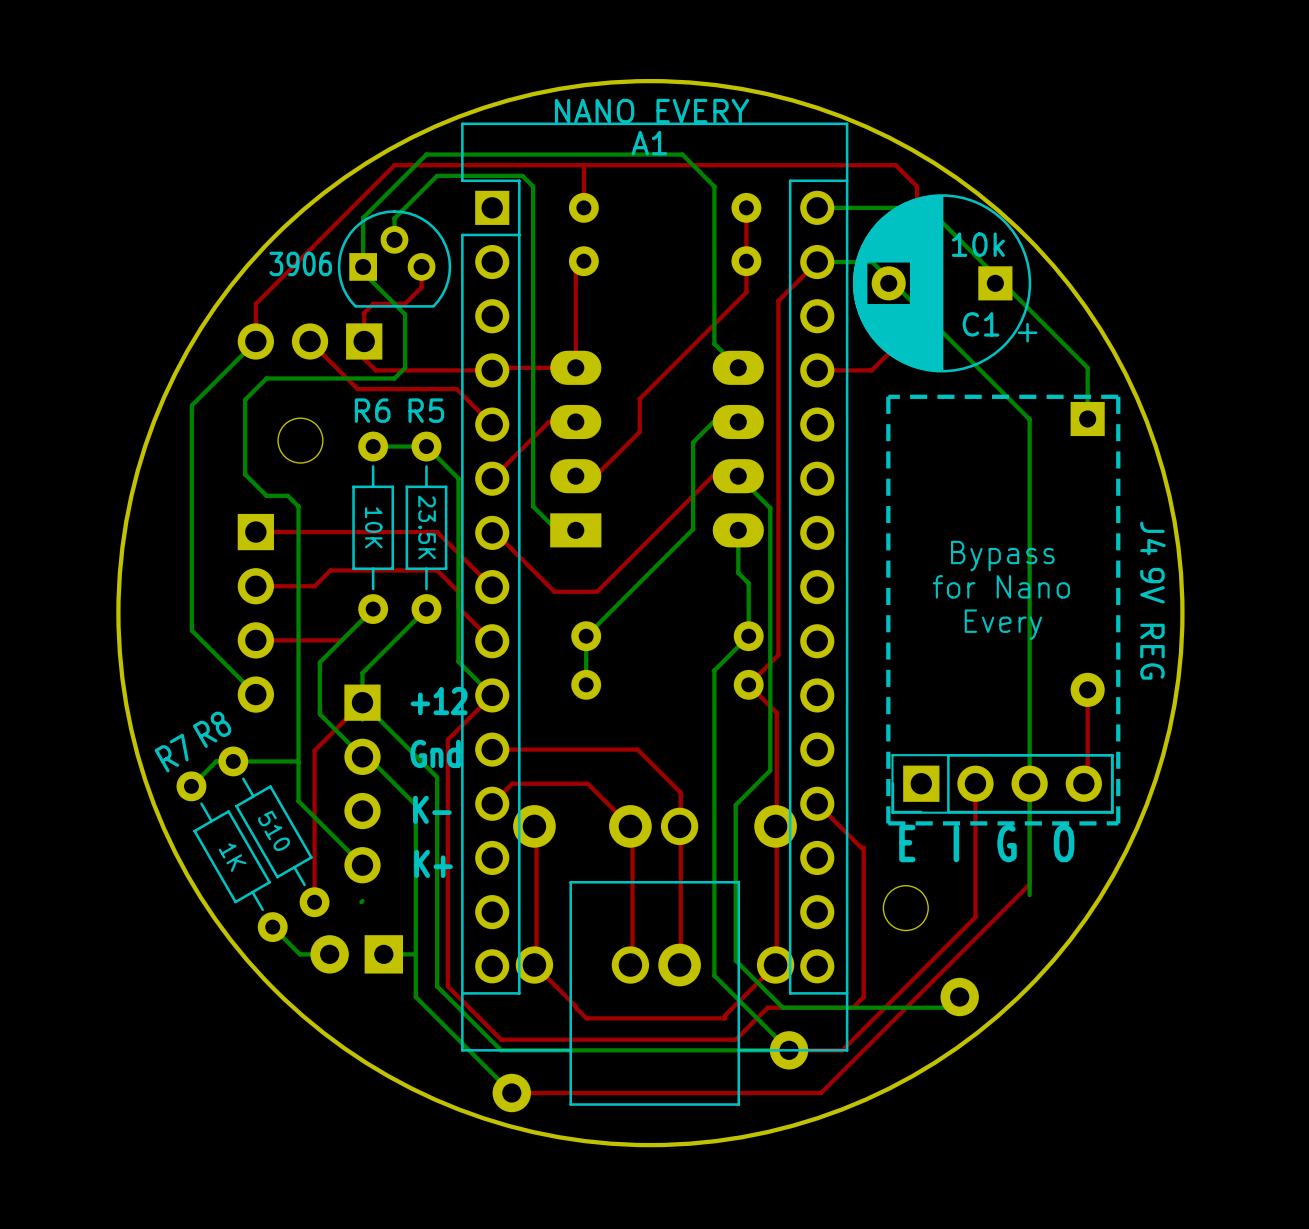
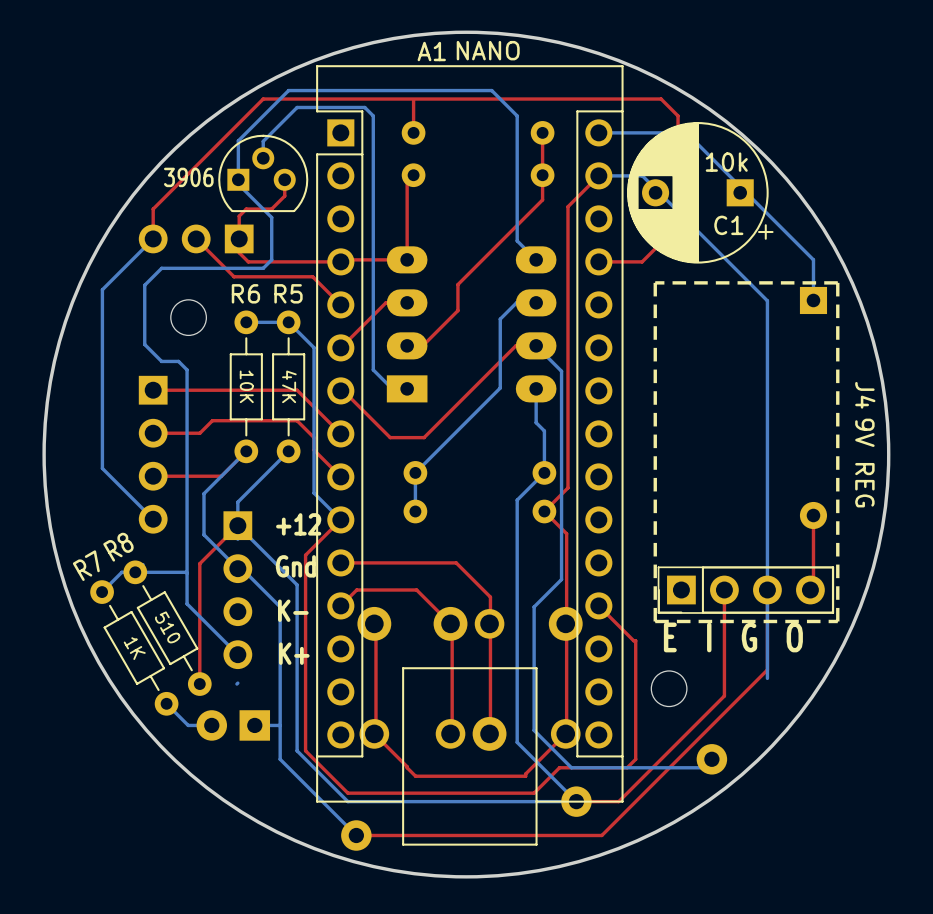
A1 value: NANO EVERY (651, 111) -> NANO (488, 50)
A1 name position: A1 (649, 143) -> A1 (431, 51)
R5 text: 23.5K (427, 527) -> 47K (289, 386)
text: Bypass (1002, 556) -> none
text: for Nano (1001, 586) -> none
text: Every (1003, 624) -> none

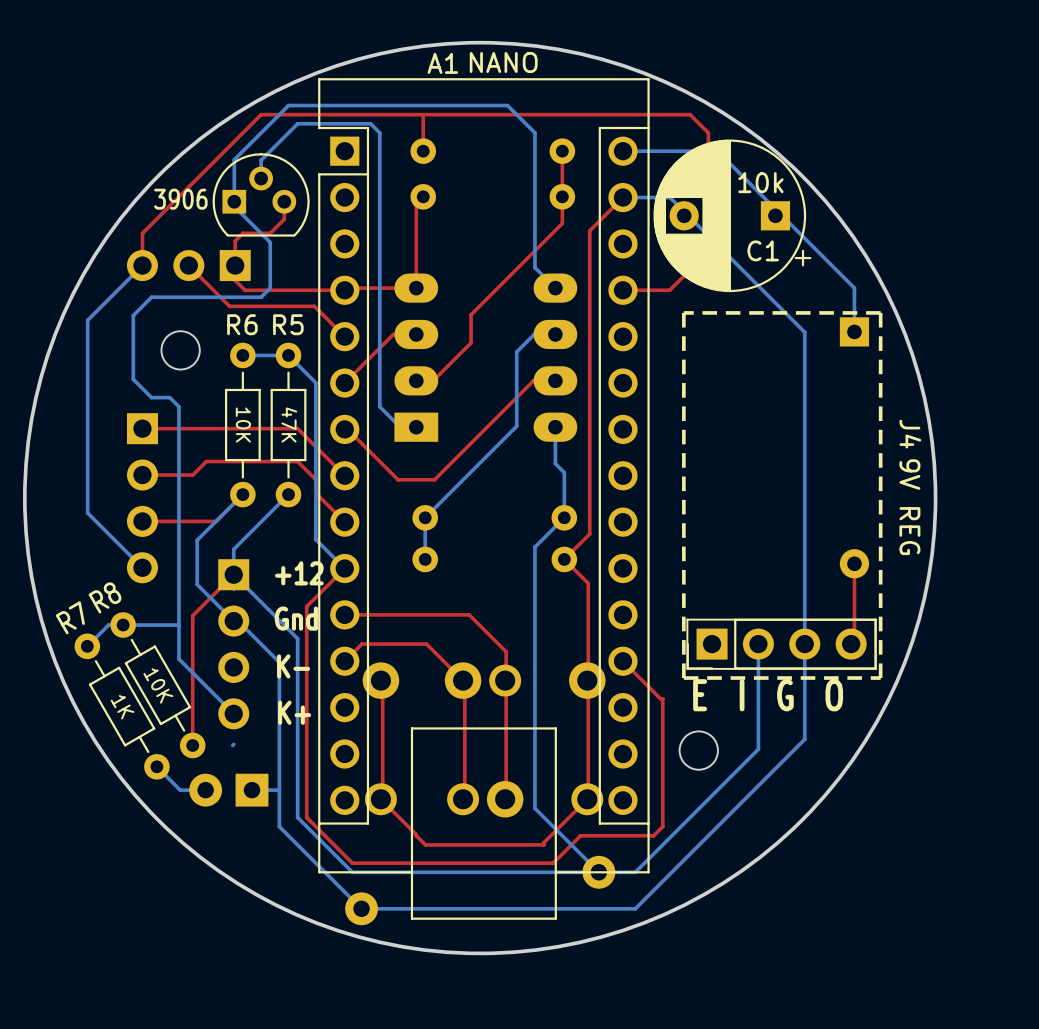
bottom track: (536, 345) (561, 371) (561, 579) (534, 606) (534, 730) (571, 767) (703, 767) (711, 759) -> none
top track: (724, 590) (724, 695) (618, 801) (576, 801) -> none
bottom track: none -> (758, 644) (758, 749) (635, 872) (598, 872)
top track: (767, 590) (767, 669) (601, 835) (356, 835) -> none
R8 text: 510 (167, 627) -> 10K (158, 685)
bottom track: none -> (804, 739) (635, 908) (361, 908)
part: (711, 759) -> none

